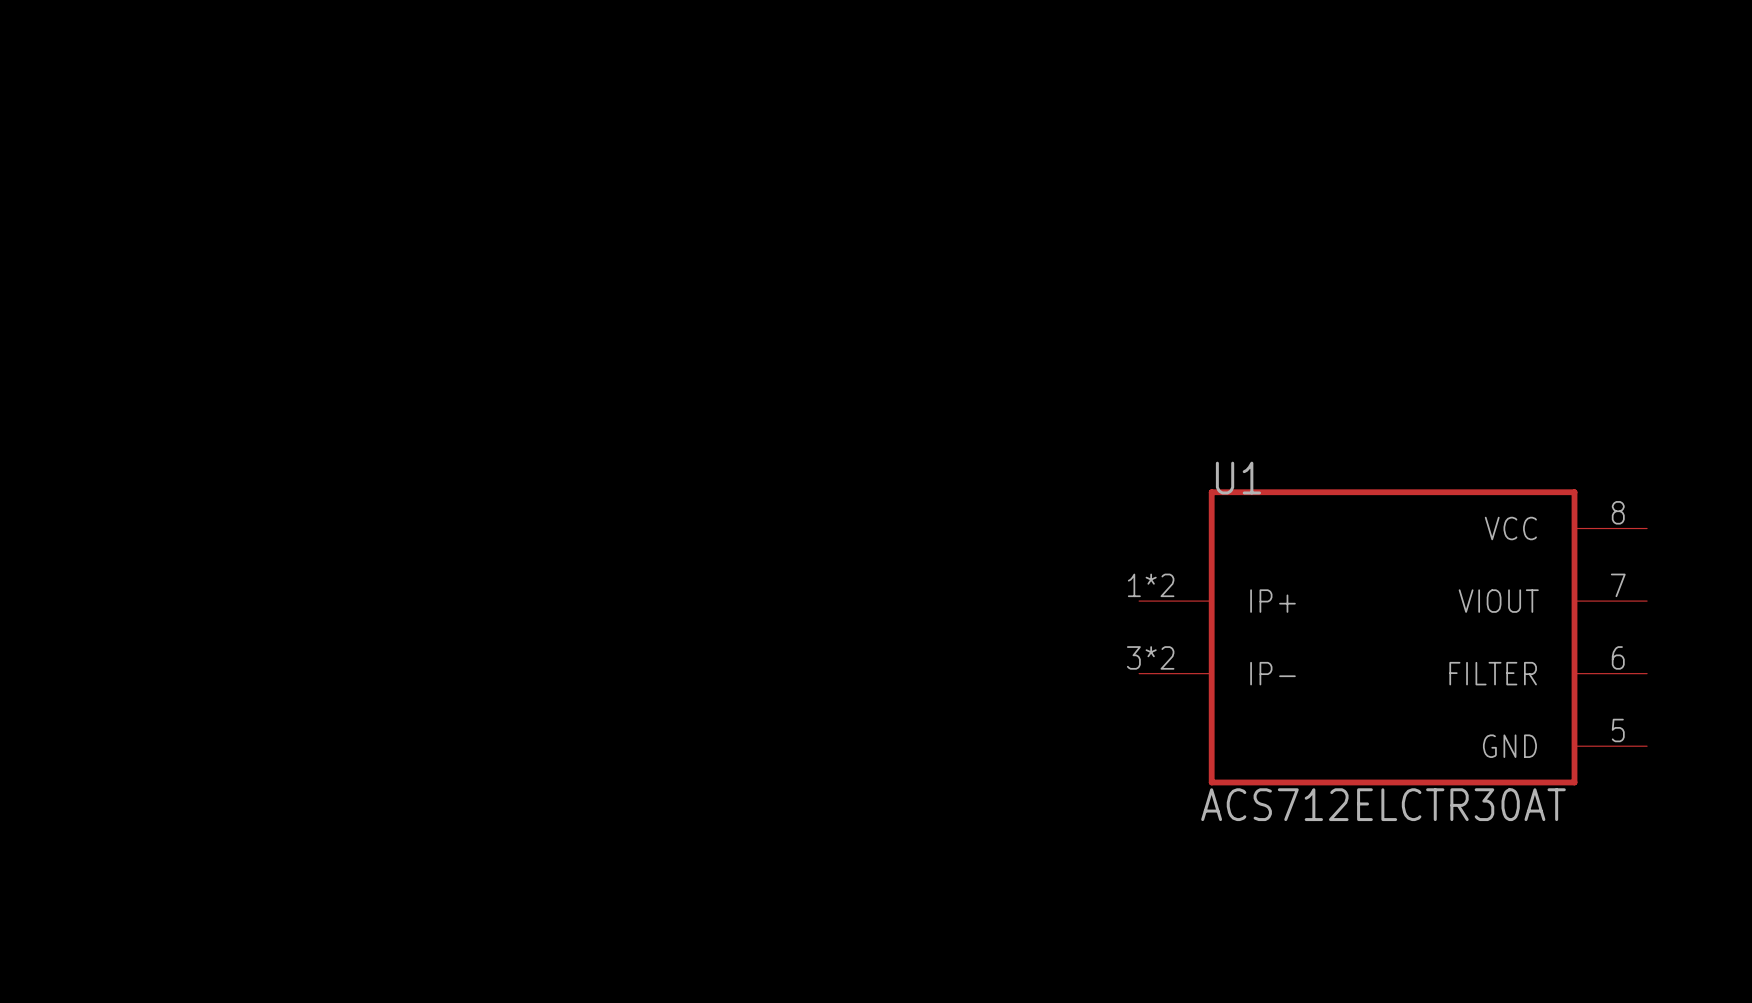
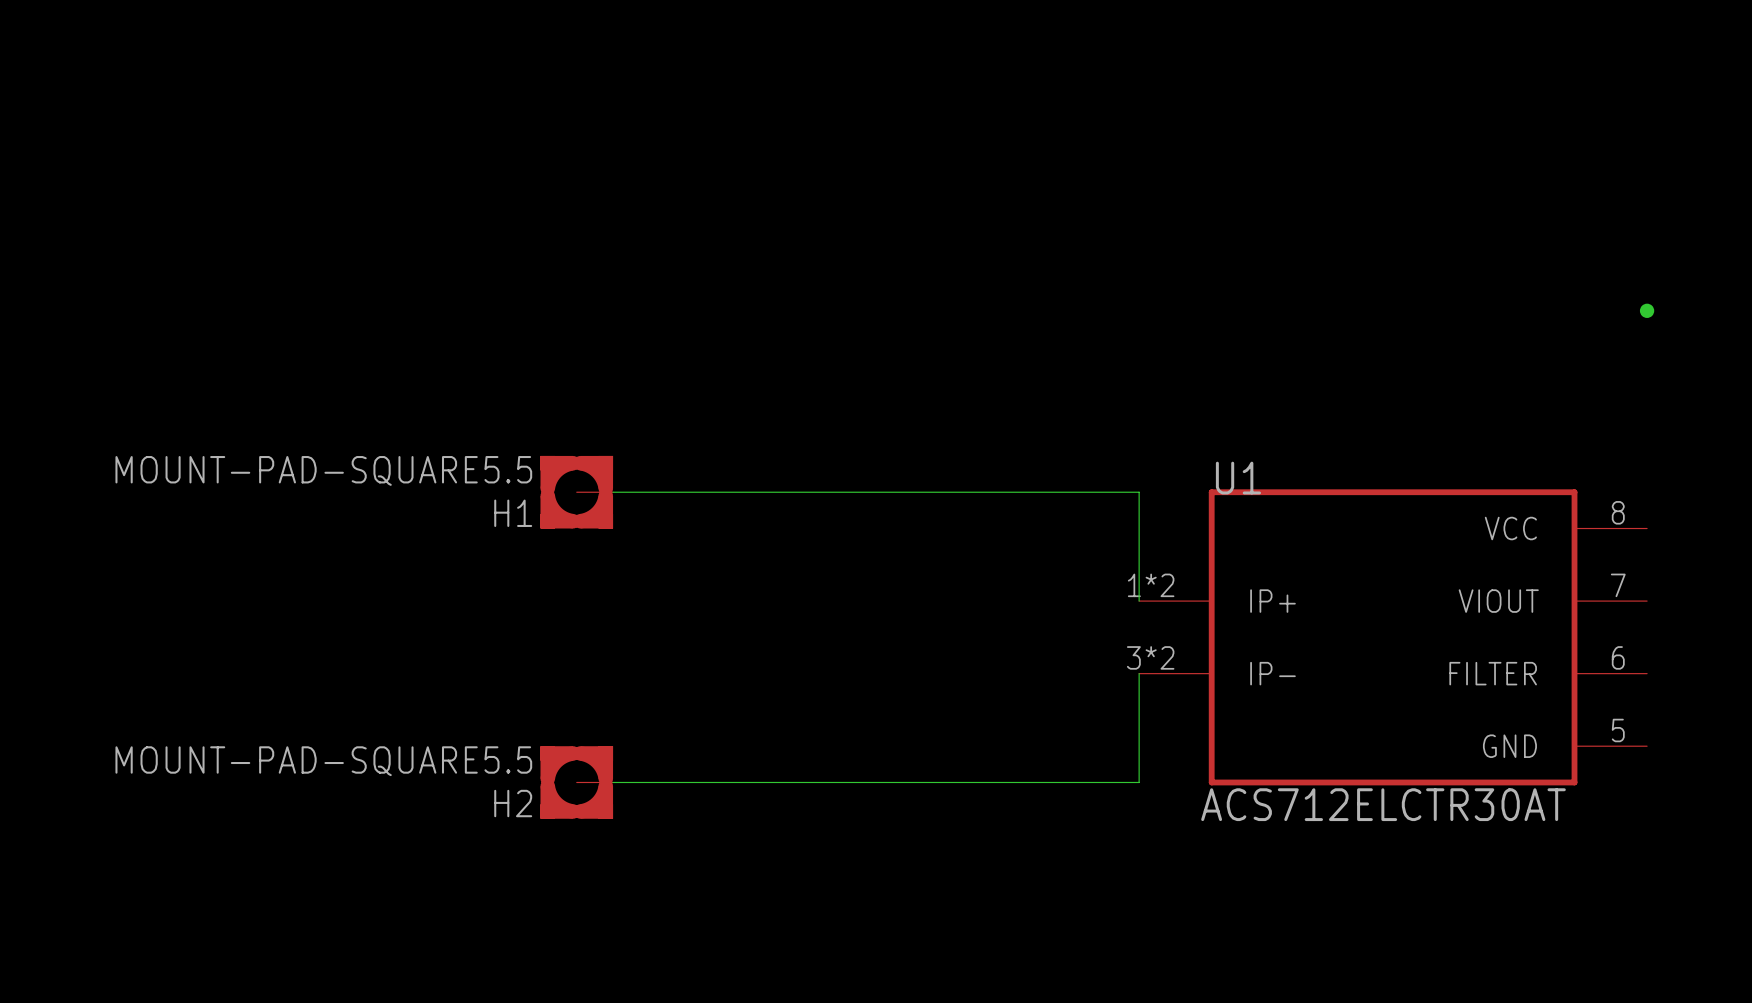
junction: none -> (1647, 310)
H1: none -> MOUNT-PAD-SQUARE5.5 (576, 492)
wire: none -> (613, 492) (1139, 492) (1139, 601)
wire: none -> (1139, 673) (1139, 782) (613, 782)
H2: none -> MOUNT-PAD-SQUARE5.5 (576, 782)

